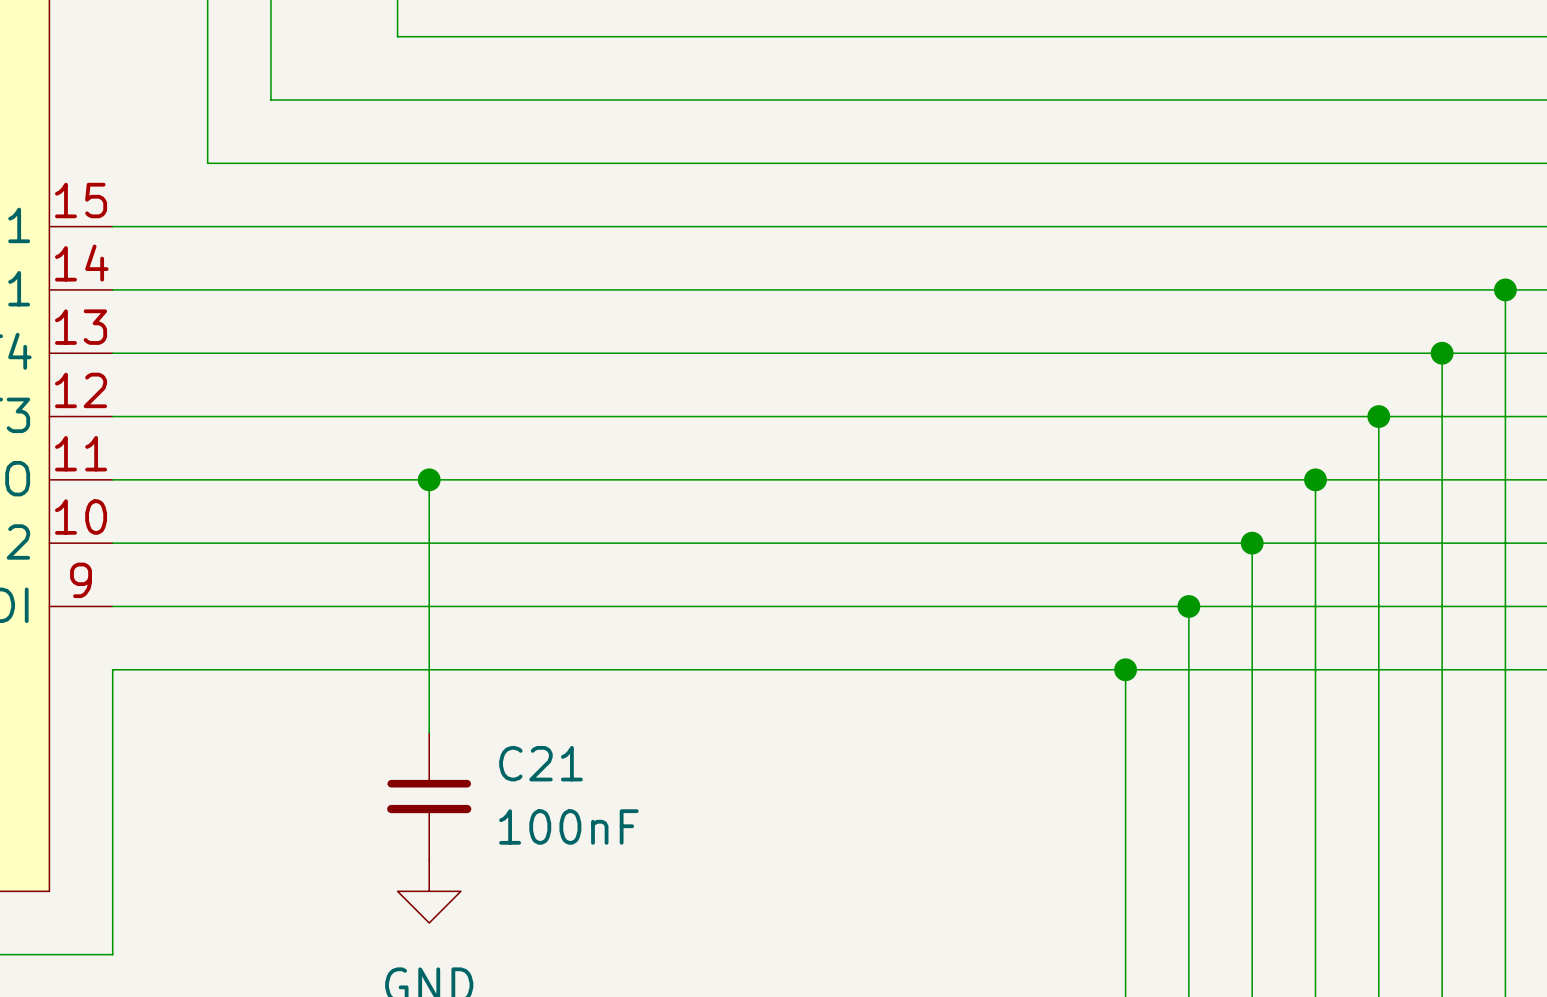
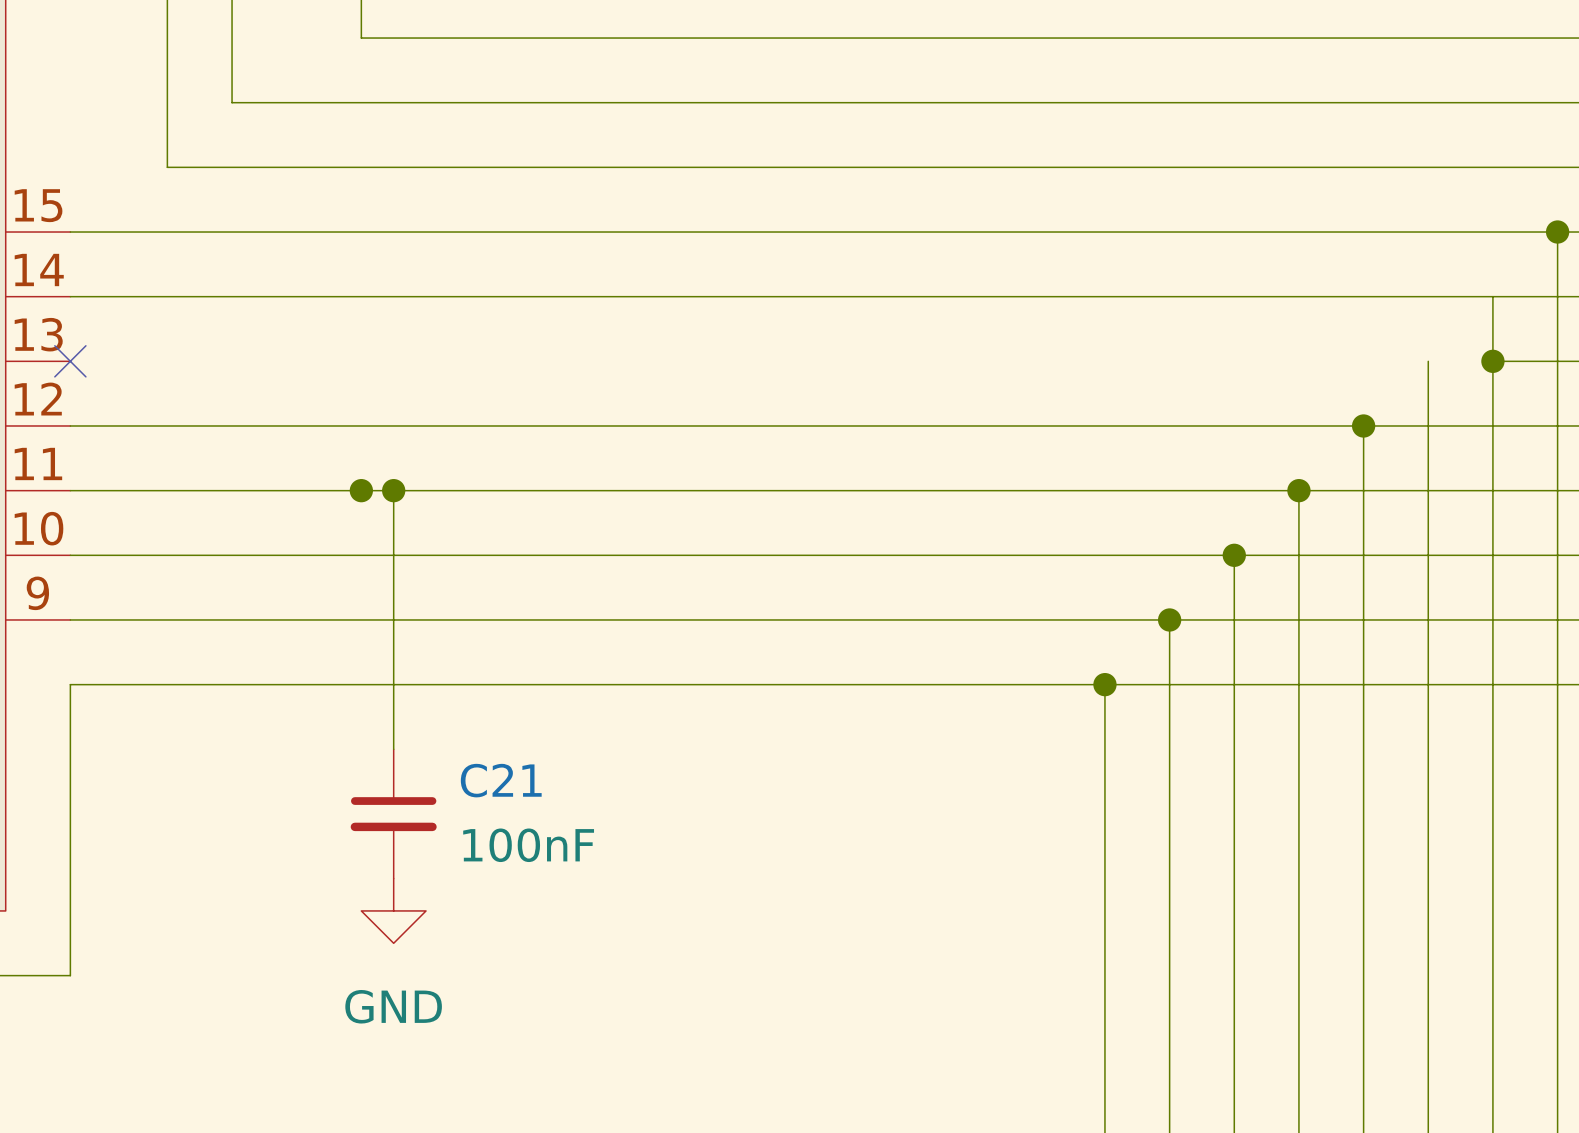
junction: (1505, 289) -> none
wire: (112, 353) (1505, 353) -> none
no-connect mark: none -> (70, 361)
junction: (1442, 353) -> none
junction: none -> (1492, 361)
junction: none -> (361, 490)

